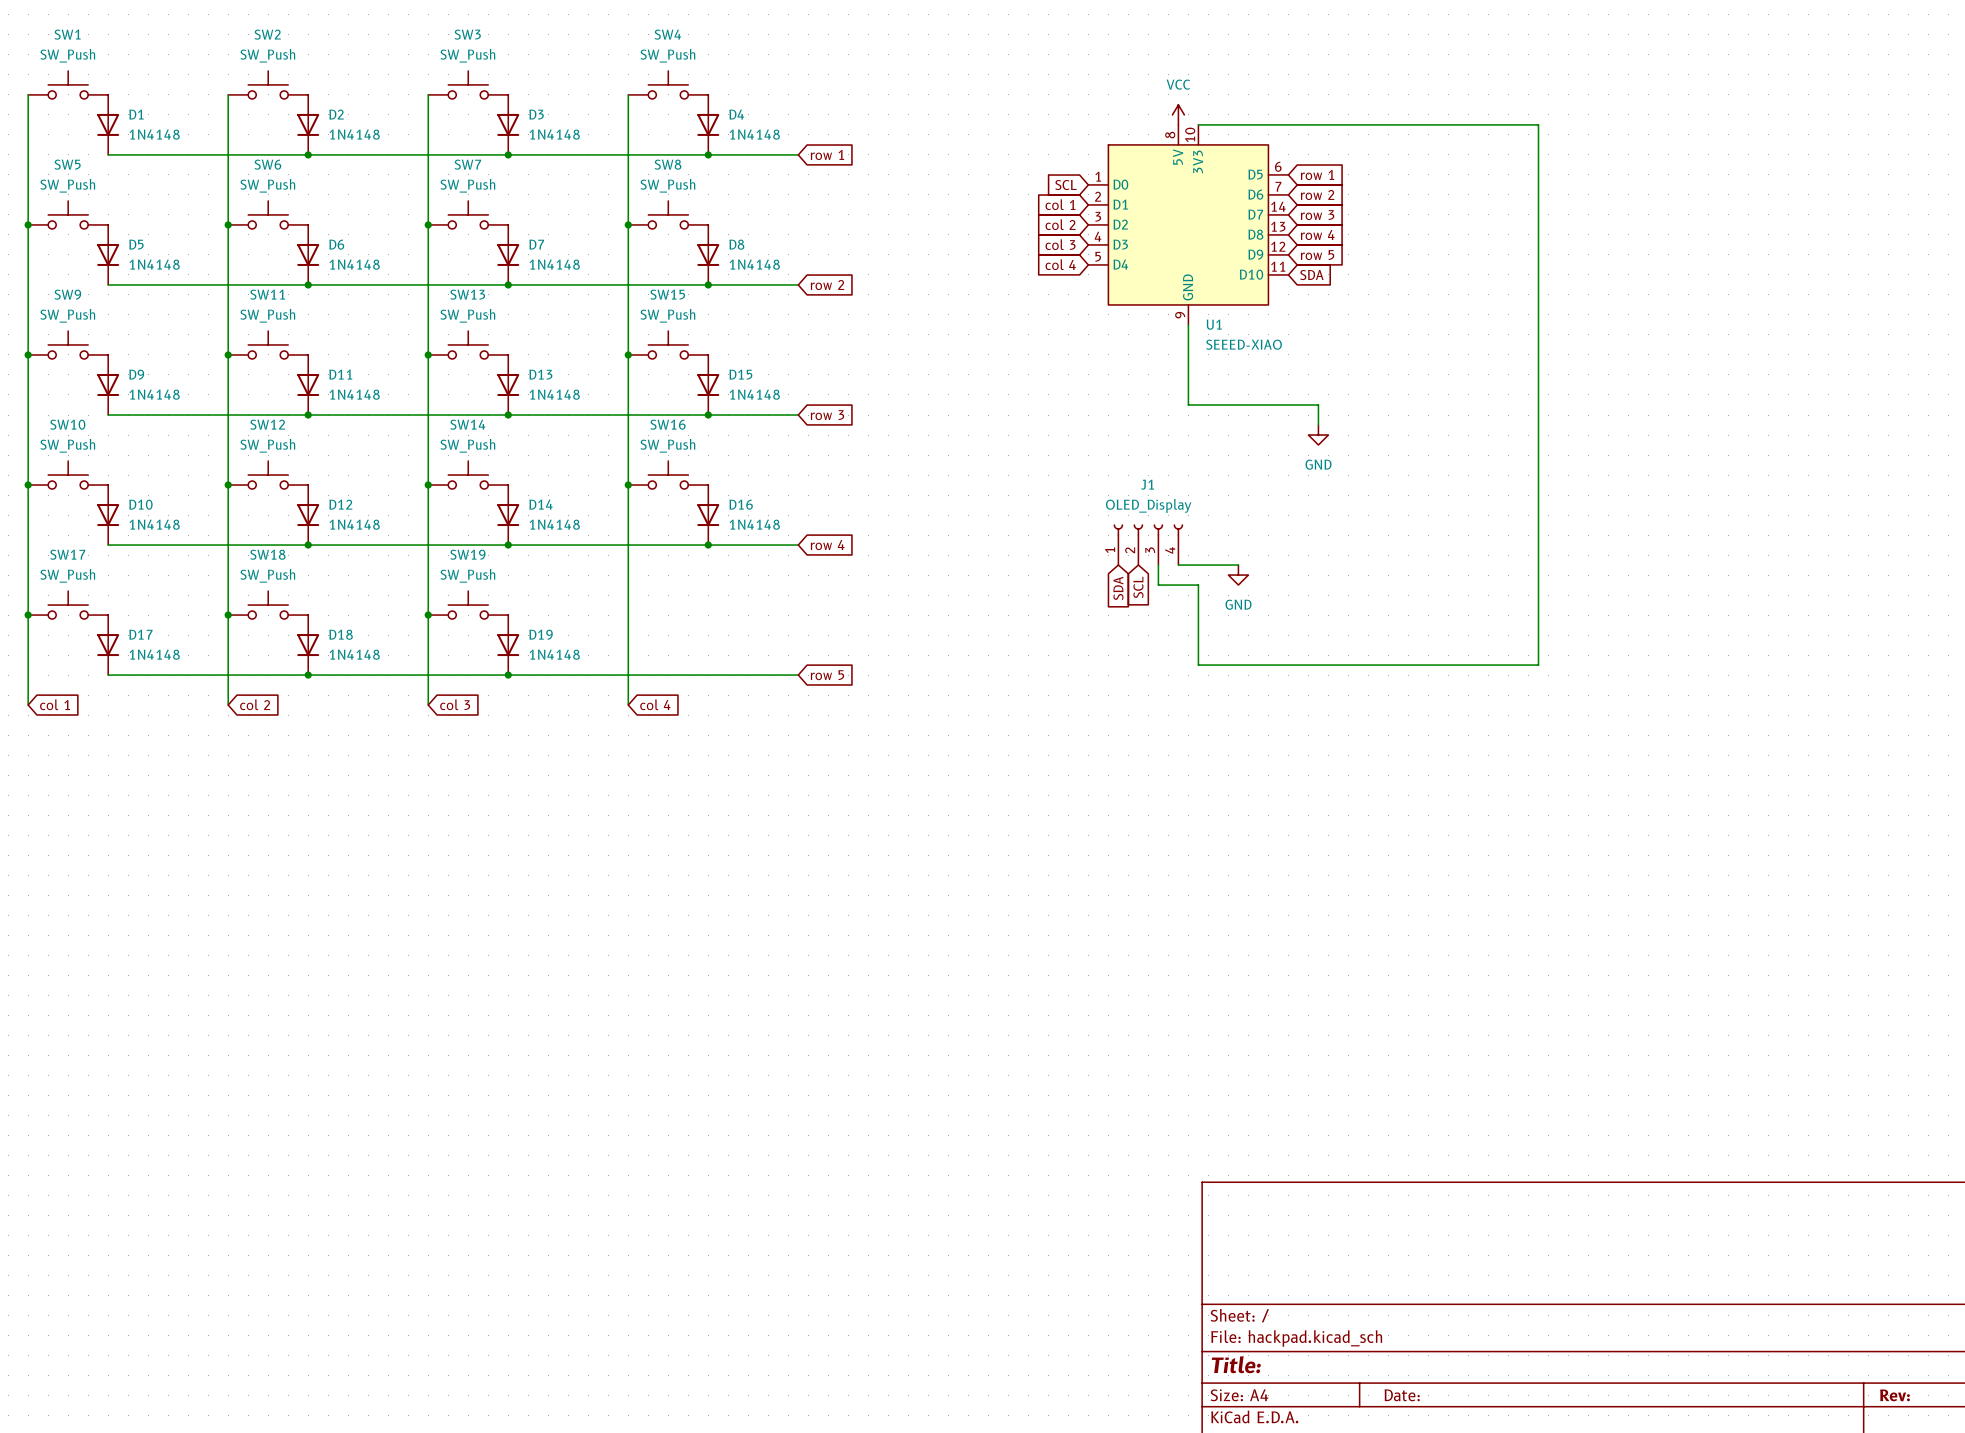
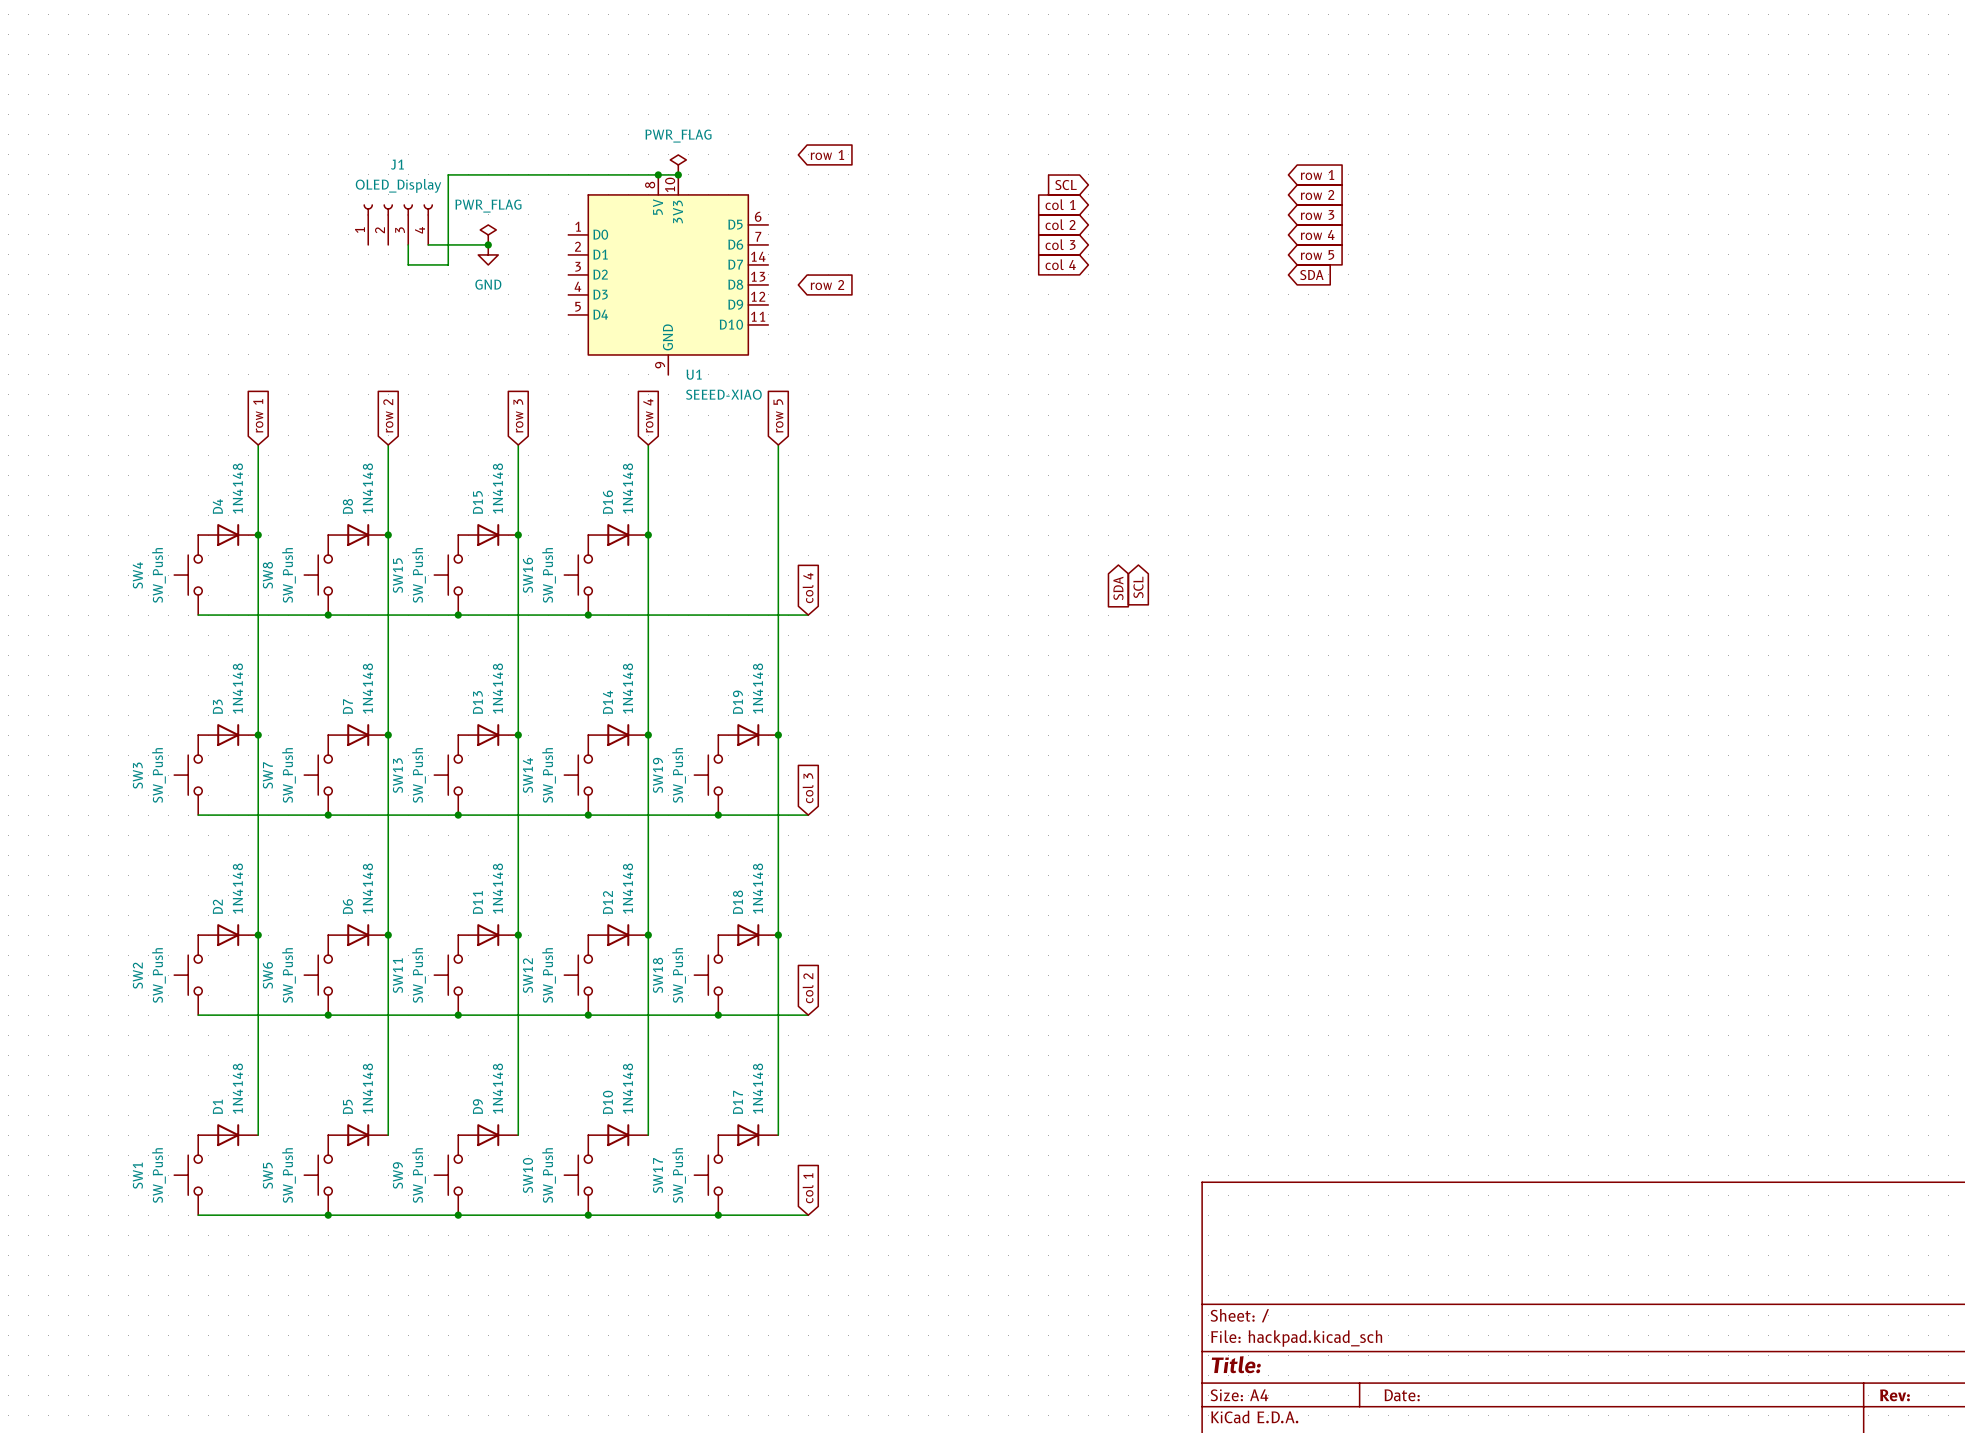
SW1 rotation: 0° (68, 84) -> 90° counterclockwise (188, 1175)
SW1 position: (68, 84) -> (188, 1175)
SW2 rotation: 0° (268, 84) -> 90° counterclockwise (188, 975)
SW2 position: (268, 84) -> (188, 975)
SW3 rotation: 0° (468, 84) -> 90° counterclockwise (188, 775)
SW3 position: (468, 84) -> (188, 775)
SW4 rotation: 0° (668, 84) -> 90° counterclockwise (188, 575)
SW4 position: (668, 84) -> (188, 575)
wire: (28, 94) (28, 705) -> none
wire: (228, 94) (228, 705) -> none
wire: (428, 94) (428, 705) -> none
wire: (628, 94) (628, 705) -> none
power symbol: VCC (1178, 114) -> none
D1 rotation: 0° (108, 124) -> 90° counterclockwise (228, 1135)
D1 position: (108, 124) -> (228, 1135)
D2 rotation: 0° (308, 124) -> 90° counterclockwise (228, 935)
D2 position: (308, 124) -> (228, 935)
D3 rotation: 0° (508, 124) -> 90° counterclockwise (228, 735)
D3 position: (508, 124) -> (228, 735)
D4 rotation: 0° (708, 124) -> 90° counterclockwise (228, 535)
D4 position: (708, 124) -> (228, 535)
wire: (1198, 124) (1538, 124) (1538, 665) (1198, 665) (1198, 585) (1158, 585) (1158, 565) -> none
wire: (108, 154) (798, 154) -> none
junction: (308, 154) -> none
junction: (508, 154) -> none
junction: (708, 154) -> none
power symbol: none -> PWR_FLAG (678, 164)
junction: none -> (658, 174)
wire: none -> (678, 174) (448, 174) (448, 264) (408, 264) (408, 244)
junction: none -> (678, 174)
SW5 rotation: 0° (68, 214) -> 90° counterclockwise (318, 1175)
SW5 position: (68, 214) -> (318, 1175)
SW6 rotation: 0° (268, 214) -> 90° counterclockwise (318, 975)
SW6 position: (268, 214) -> (318, 975)
SW7 rotation: 0° (468, 214) -> 90° counterclockwise (318, 775)
SW7 position: (468, 214) -> (318, 775)
SW8 rotation: 0° (668, 214) -> 90° counterclockwise (318, 575)
SW8 position: (668, 214) -> (318, 575)
junction: (28, 224) -> none
junction: (228, 224) -> none
junction: (428, 224) -> none
junction: (628, 224) -> none
U1 position: (1188, 224) -> (668, 274)
power symbol: none -> PWR_FLAG (488, 234)
wire: none -> (428, 244) (488, 244)
junction: none -> (488, 244)
D5 rotation: 0° (108, 254) -> 90° counterclockwise (358, 1135)
D5 position: (108, 254) -> (358, 1135)
D6 rotation: 0° (308, 254) -> 90° counterclockwise (358, 935)
D6 position: (308, 254) -> (358, 935)
power symbol: none -> GND (488, 254)
D7 rotation: 0° (508, 254) -> 90° counterclockwise (358, 735)
D7 position: (508, 254) -> (358, 735)
D8 rotation: 0° (708, 254) -> 90° counterclockwise (358, 535)
D8 position: (708, 254) -> (358, 535)
wire: (108, 284) (798, 284) -> none
junction: (308, 284) -> none
junction: (508, 284) -> none
junction: (708, 284) -> none
wire: (1188, 324) (1188, 404) (1318, 404) (1318, 425) -> none
SW9 rotation: 0° (68, 344) -> 90° counterclockwise (448, 1175)
SW9 position: (68, 344) -> (448, 1175)
SW11 rotation: 0° (268, 344) -> 90° counterclockwise (448, 975)
SW11 position: (268, 344) -> (448, 975)
SW13 rotation: 0° (468, 344) -> 90° counterclockwise (448, 775)
SW13 position: (468, 344) -> (448, 775)
SW15 rotation: 0° (668, 344) -> 90° counterclockwise (448, 575)
SW15 position: (668, 344) -> (448, 575)
junction: (28, 354) -> none
junction: (228, 354) -> none
junction: (428, 354) -> none
junction: (628, 354) -> none
D9 rotation: 0° (108, 384) -> 90° counterclockwise (488, 1135)
D9 position: (108, 384) -> (488, 1135)
D11 rotation: 0° (308, 384) -> 90° counterclockwise (488, 935)
D11 position: (308, 384) -> (488, 935)
D13 rotation: 0° (508, 384) -> 90° counterclockwise (488, 735)
D13 position: (508, 384) -> (488, 735)
D15 rotation: 0° (708, 384) -> 90° counterclockwise (488, 535)
D15 position: (708, 384) -> (488, 535)
wire: (108, 415) (798, 415) -> none
global label: none -> row 1 (258, 415)
junction: (308, 415) -> none
global label: none -> row 2 (388, 415)
junction: (508, 415) -> none
global label: none -> row 3 (518, 415)
junction: (708, 415) -> none
global label: none -> row 5 (778, 415)
global label: row 3 (827, 415) -> none
power symbol: GND (1318, 435) -> none
wire: none -> (258, 445) (258, 1135)
wire: none -> (388, 445) (388, 1135)
wire: none -> (518, 445) (518, 1135)
wire: none -> (648, 445) (648, 1135)
wire: none -> (778, 445) (778, 1135)
SW10 rotation: 0° (68, 475) -> 90° counterclockwise (578, 1175)
SW10 position: (68, 475) -> (578, 1175)
SW12 rotation: 0° (268, 475) -> 90° counterclockwise (578, 975)
SW12 position: (268, 475) -> (578, 975)
SW14 rotation: 0° (468, 475) -> 90° counterclockwise (578, 775)
SW14 position: (468, 475) -> (578, 775)
SW16 rotation: 0° (668, 475) -> 90° counterclockwise (578, 575)
SW16 position: (668, 475) -> (578, 575)
junction: (28, 485) -> none
junction: (228, 485) -> none
junction: (428, 485) -> none
junction: (628, 485) -> none
D10 rotation: 0° (108, 515) -> 90° counterclockwise (618, 1135)
D10 position: (108, 515) -> (618, 1135)
D12 rotation: 0° (308, 515) -> 90° counterclockwise (618, 935)
D12 position: (308, 515) -> (618, 935)
D14 rotation: 0° (508, 515) -> 90° counterclockwise (618, 735)
D14 position: (508, 515) -> (618, 735)
D16 rotation: 0° (708, 515) -> 90° counterclockwise (618, 535)
D16 position: (708, 515) -> (618, 535)
junction: none -> (258, 535)
junction: none -> (388, 535)
junction: none -> (648, 535)
J1 position: (1148, 544) -> (398, 224)
wire: (108, 545) (798, 545) -> none
junction: (308, 545) -> none
junction position: (508, 545) -> (518, 535)
junction: (708, 545) -> none
global label rotation: 0° (827, 545) -> 90° counterclockwise (648, 415)
global label position: row 4 (827, 545) -> row 4 (648, 415)
wire: (1178, 565) (1238, 565) -> none
power symbol: GND (1238, 575) -> none
global label: none -> col 4 (808, 587)
SW17 rotation: 0° (68, 605) -> 90° counterclockwise (708, 1175)
SW17 position: (68, 605) -> (708, 1175)
SW18 rotation: 0° (268, 605) -> 90° counterclockwise (708, 975)
SW18 position: (268, 605) -> (708, 975)
SW19 rotation: 0° (468, 605) -> 90° counterclockwise (708, 775)
SW19 position: (468, 605) -> (708, 775)
junction: (28, 615) -> none
wire: none -> (198, 615) (808, 615)
junction: (228, 615) -> none
junction: none -> (328, 615)
junction position: (428, 615) -> (458, 615)
junction: none -> (588, 615)
D17 rotation: 0° (108, 645) -> 90° counterclockwise (748, 1135)
D17 position: (108, 645) -> (748, 1135)
D18 rotation: 0° (308, 645) -> 90° counterclockwise (748, 935)
D18 position: (308, 645) -> (748, 935)
D19 rotation: 0° (508, 645) -> 90° counterclockwise (748, 735)
D19 position: (508, 645) -> (748, 735)
wire: (108, 675) (798, 675) -> none
junction: (308, 675) -> none
junction: (508, 675) -> none
global label: row 5 (827, 675) -> none
global label: col 1 (55, 704) -> none
global label: col 2 (255, 704) -> none
global label: col 3 (455, 704) -> none
global label: col 4 (655, 704) -> none
junction: none -> (258, 735)
junction: none -> (388, 735)
junction: none -> (518, 735)
junction: none -> (648, 735)
junction: none -> (778, 735)
global label: none -> col 3 (808, 788)
wire: none -> (198, 815) (808, 815)
junction: none -> (328, 815)
junction: none -> (458, 815)
junction: none -> (588, 815)
junction: none -> (718, 815)
junction: none -> (258, 935)
junction: none -> (388, 935)
junction: none -> (518, 935)
junction: none -> (648, 935)
junction: none -> (778, 935)
global label: none -> col 2 (808, 988)
wire: none -> (198, 1015) (808, 1015)
junction: none -> (328, 1015)
junction: none -> (458, 1015)
junction: none -> (588, 1015)
junction: none -> (718, 1015)
global label: none -> col 1 (808, 1188)
wire: none -> (198, 1215) (808, 1215)
junction: none -> (328, 1215)
junction: none -> (458, 1215)
junction: none -> (588, 1215)
junction: none -> (718, 1215)

